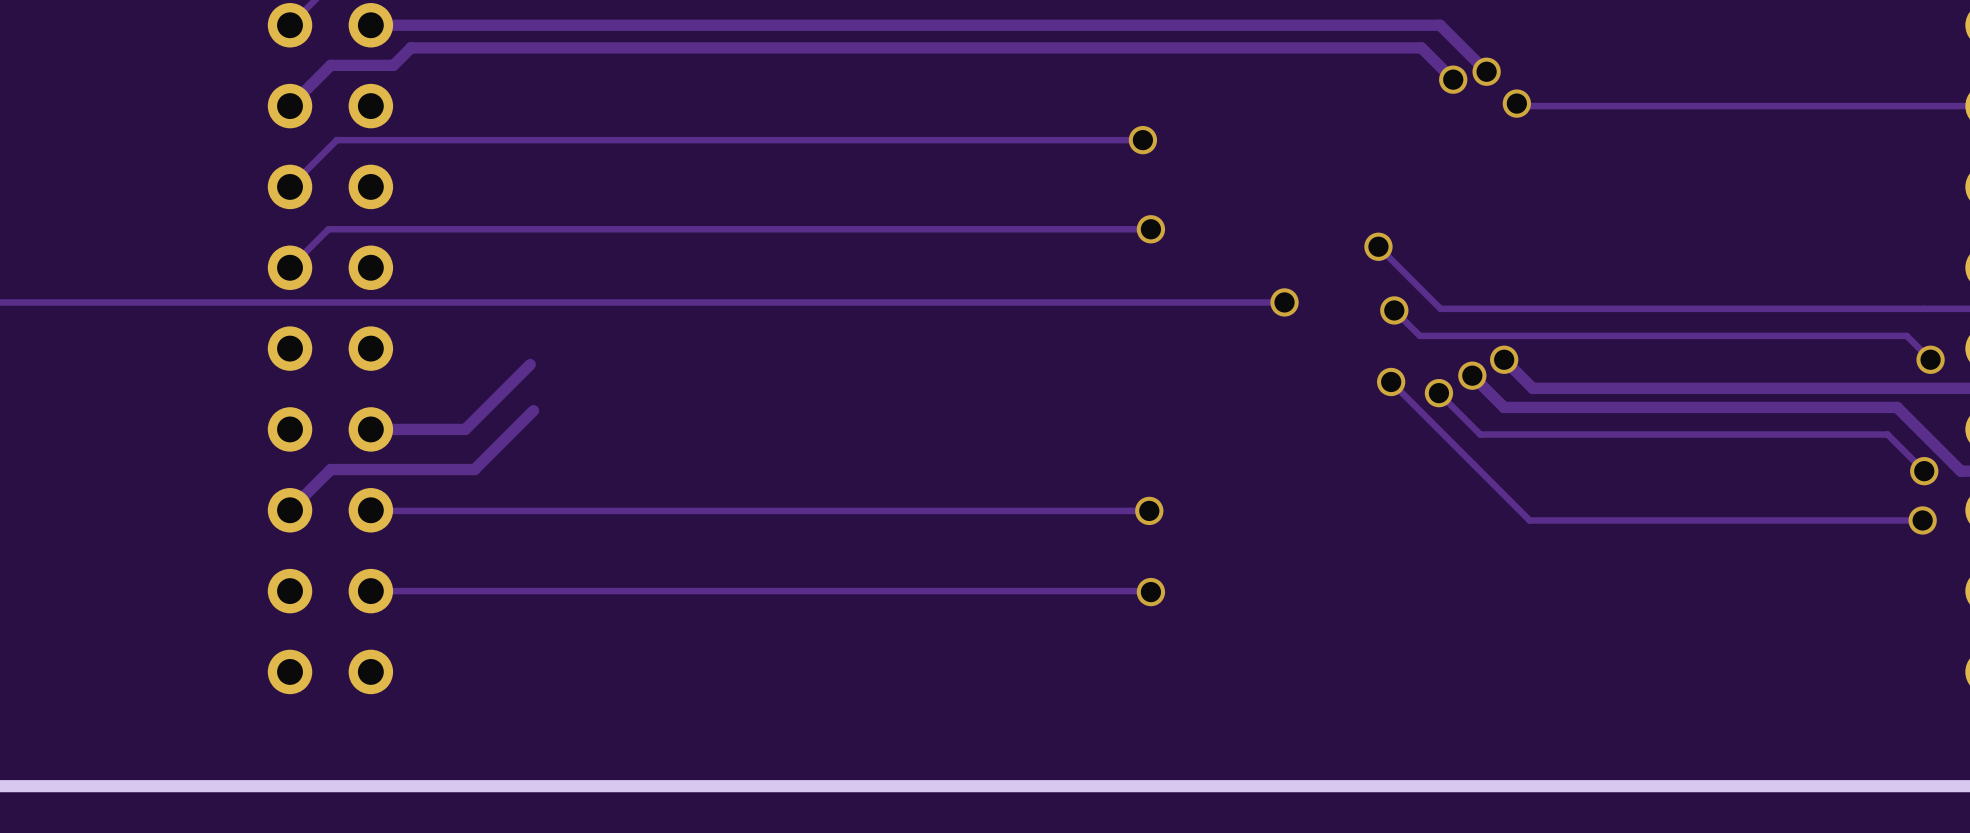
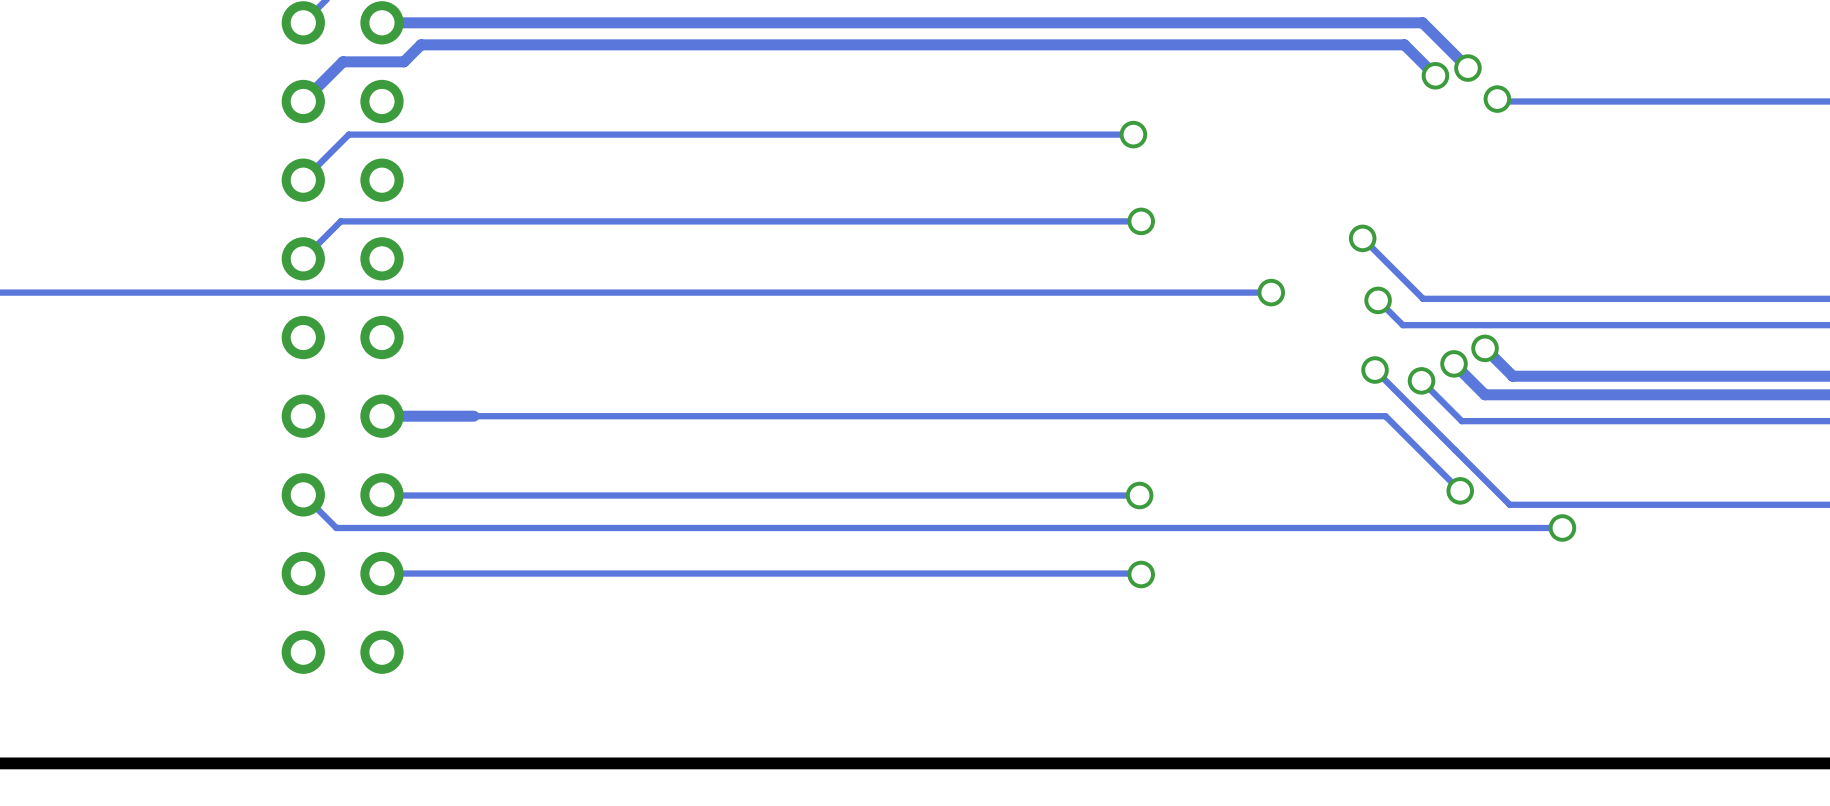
track: (530, 364) (465, 429) -> (1460, 490) (1385, 416) (473, 416)
track: (533, 410) (474, 469) (330, 469) (290, 510) -> (1562, 528) (336, 528) (303, 494)
via: none -> (1460, 490)
via: none -> (1562, 528)

